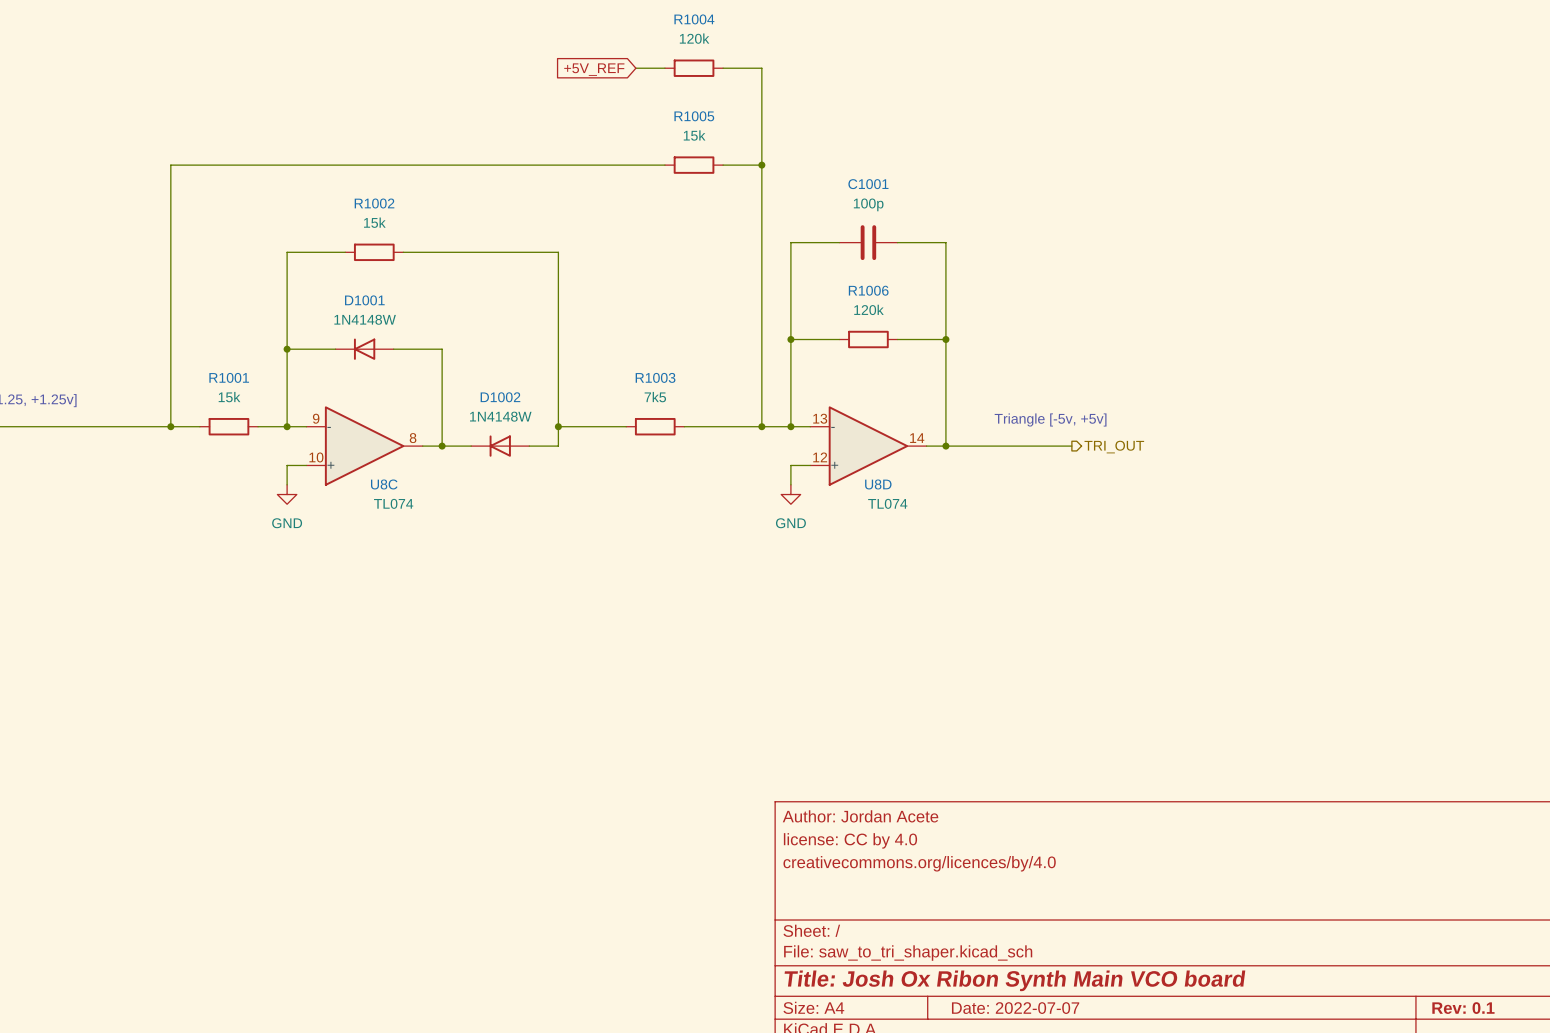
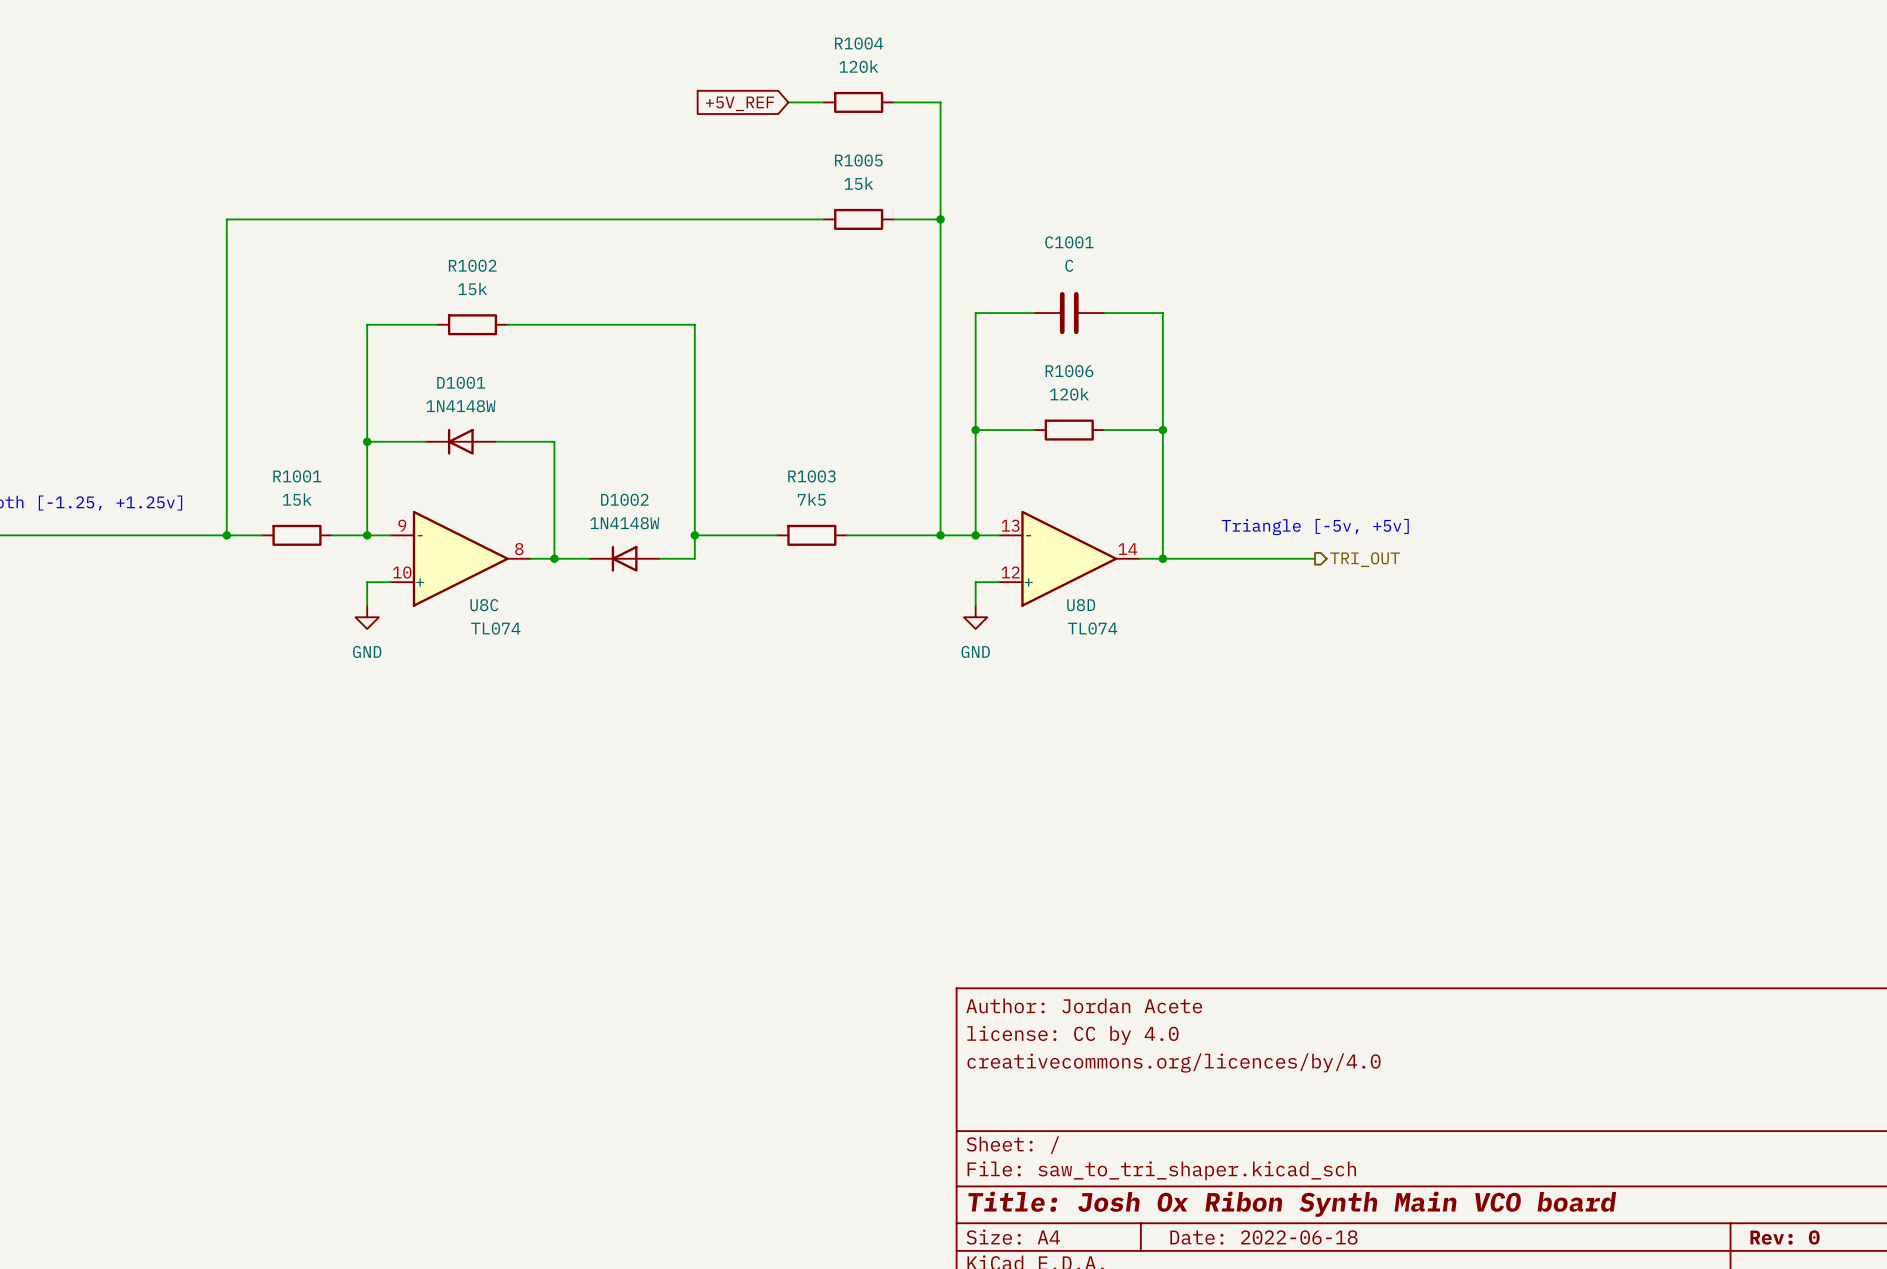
C1001 value: 100p (868, 204) -> C (1069, 265)
title block: Date: 2022-07-07 (1015, 1008) -> Date: 2022-06-18 (1263, 1237)
title block: Rev: 0.1 (1463, 1008) -> Rev: 0 (1785, 1237)

